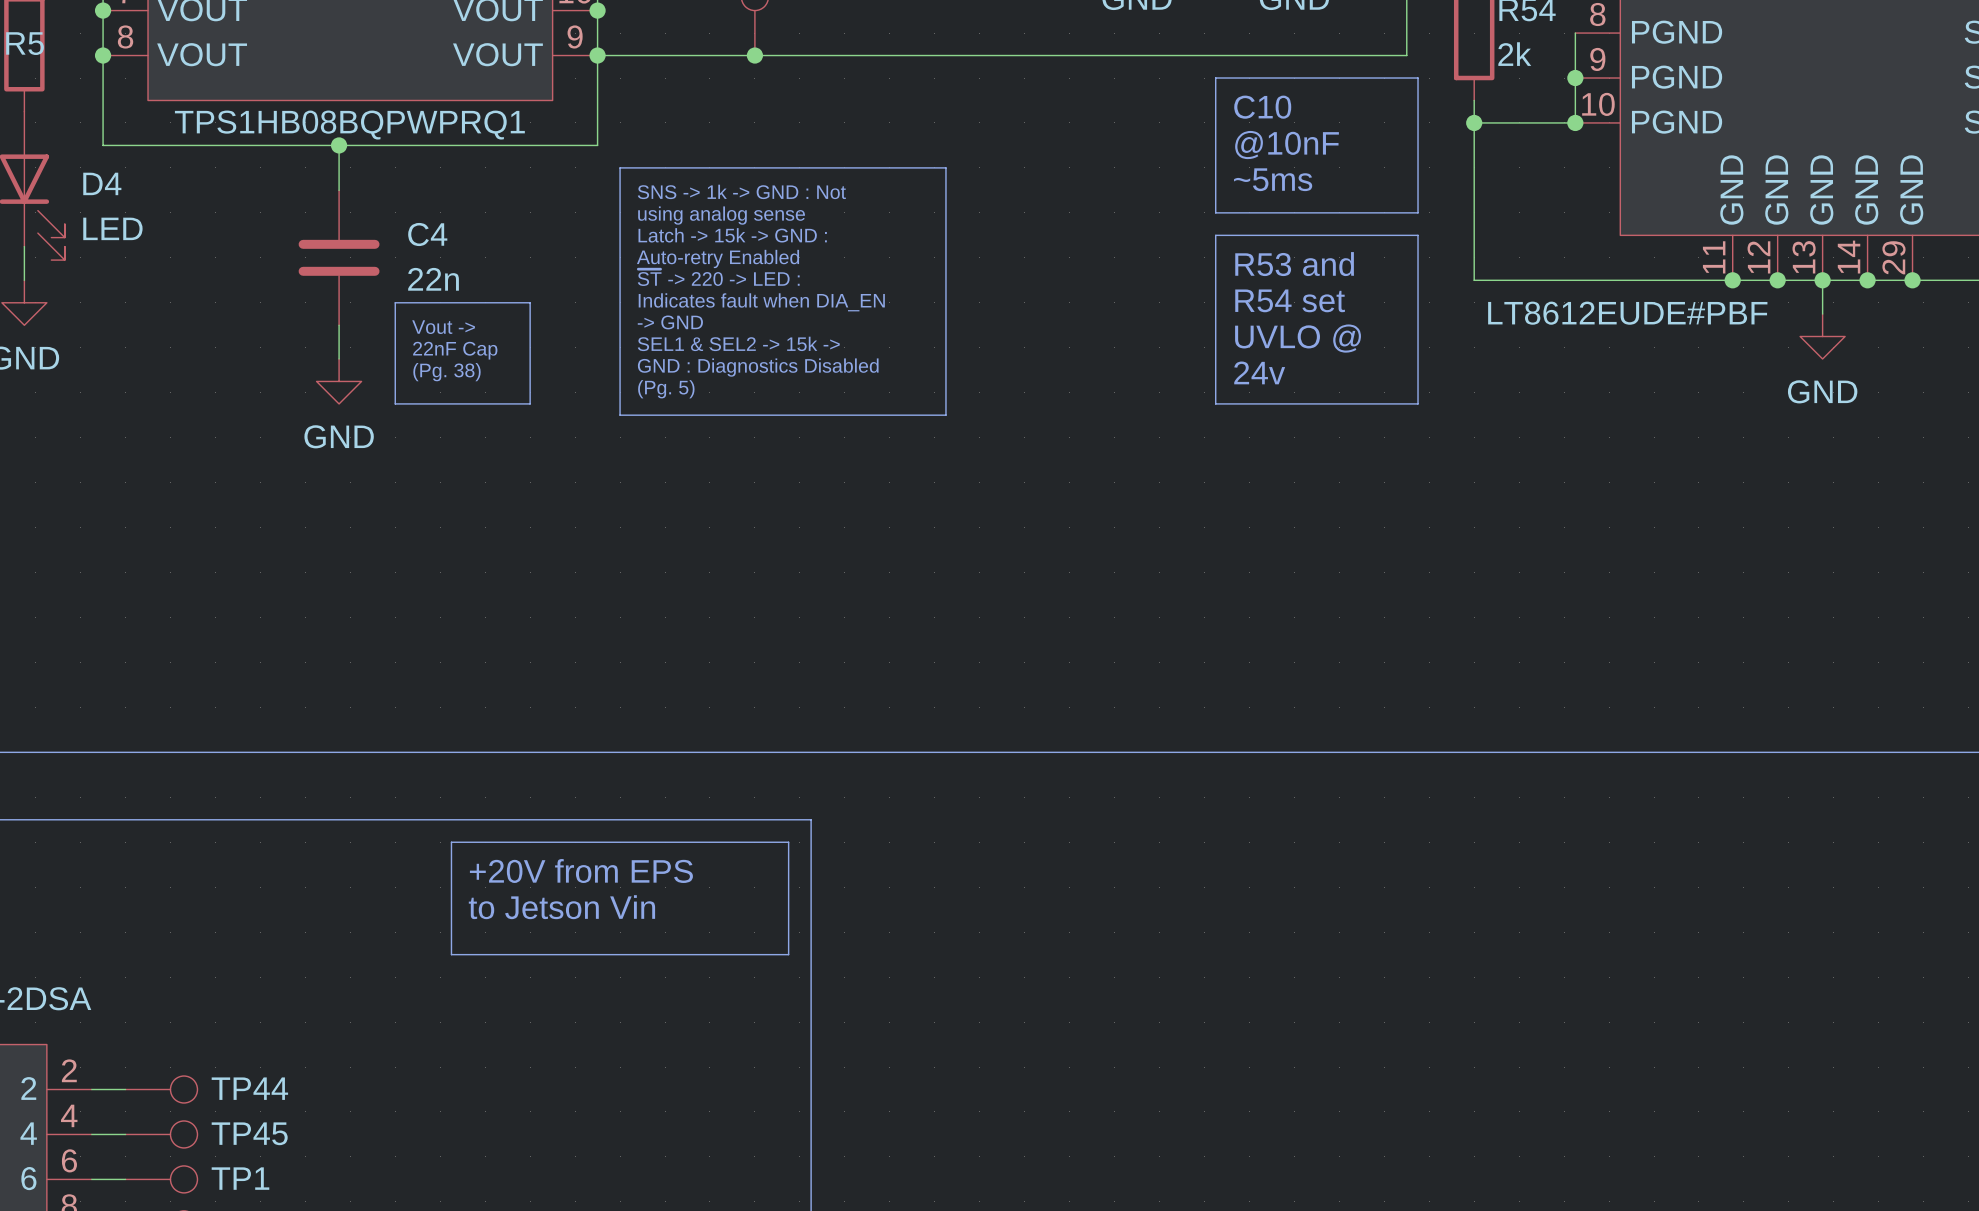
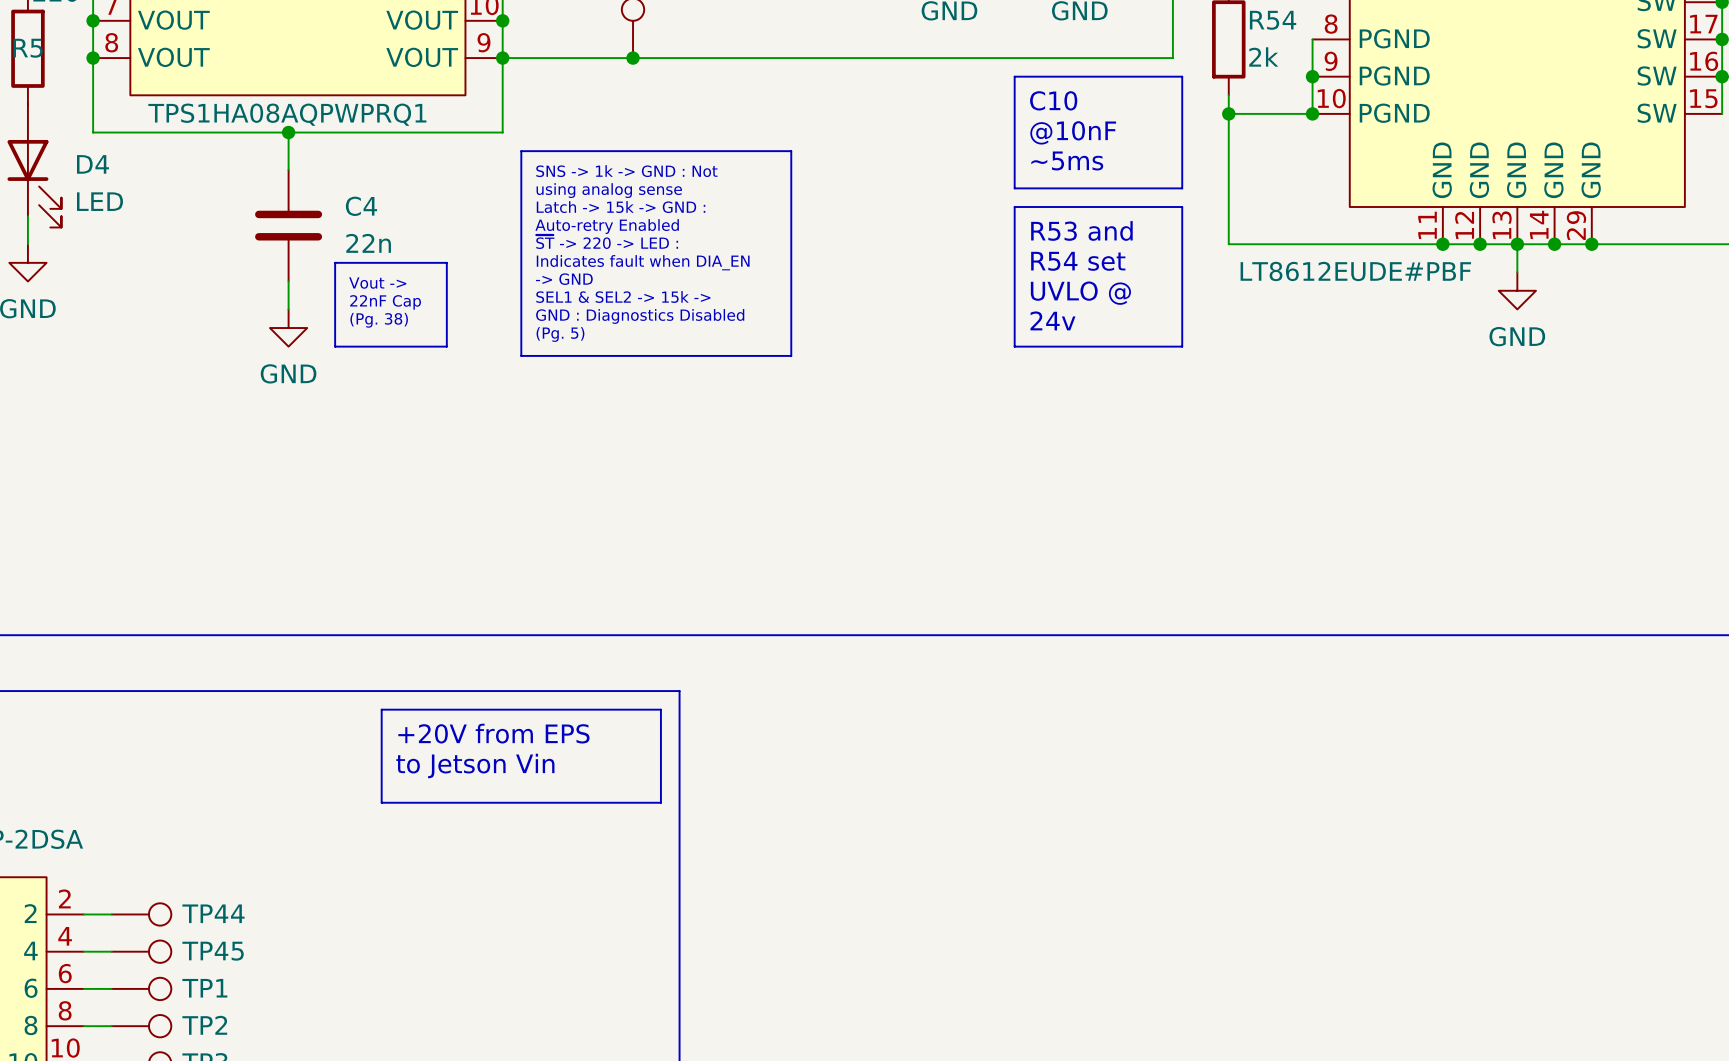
part value: TPS1HB08BQPWPRQ1 (349, 125) -> TPS1HA08AQPWPRQ1 (287, 114)

